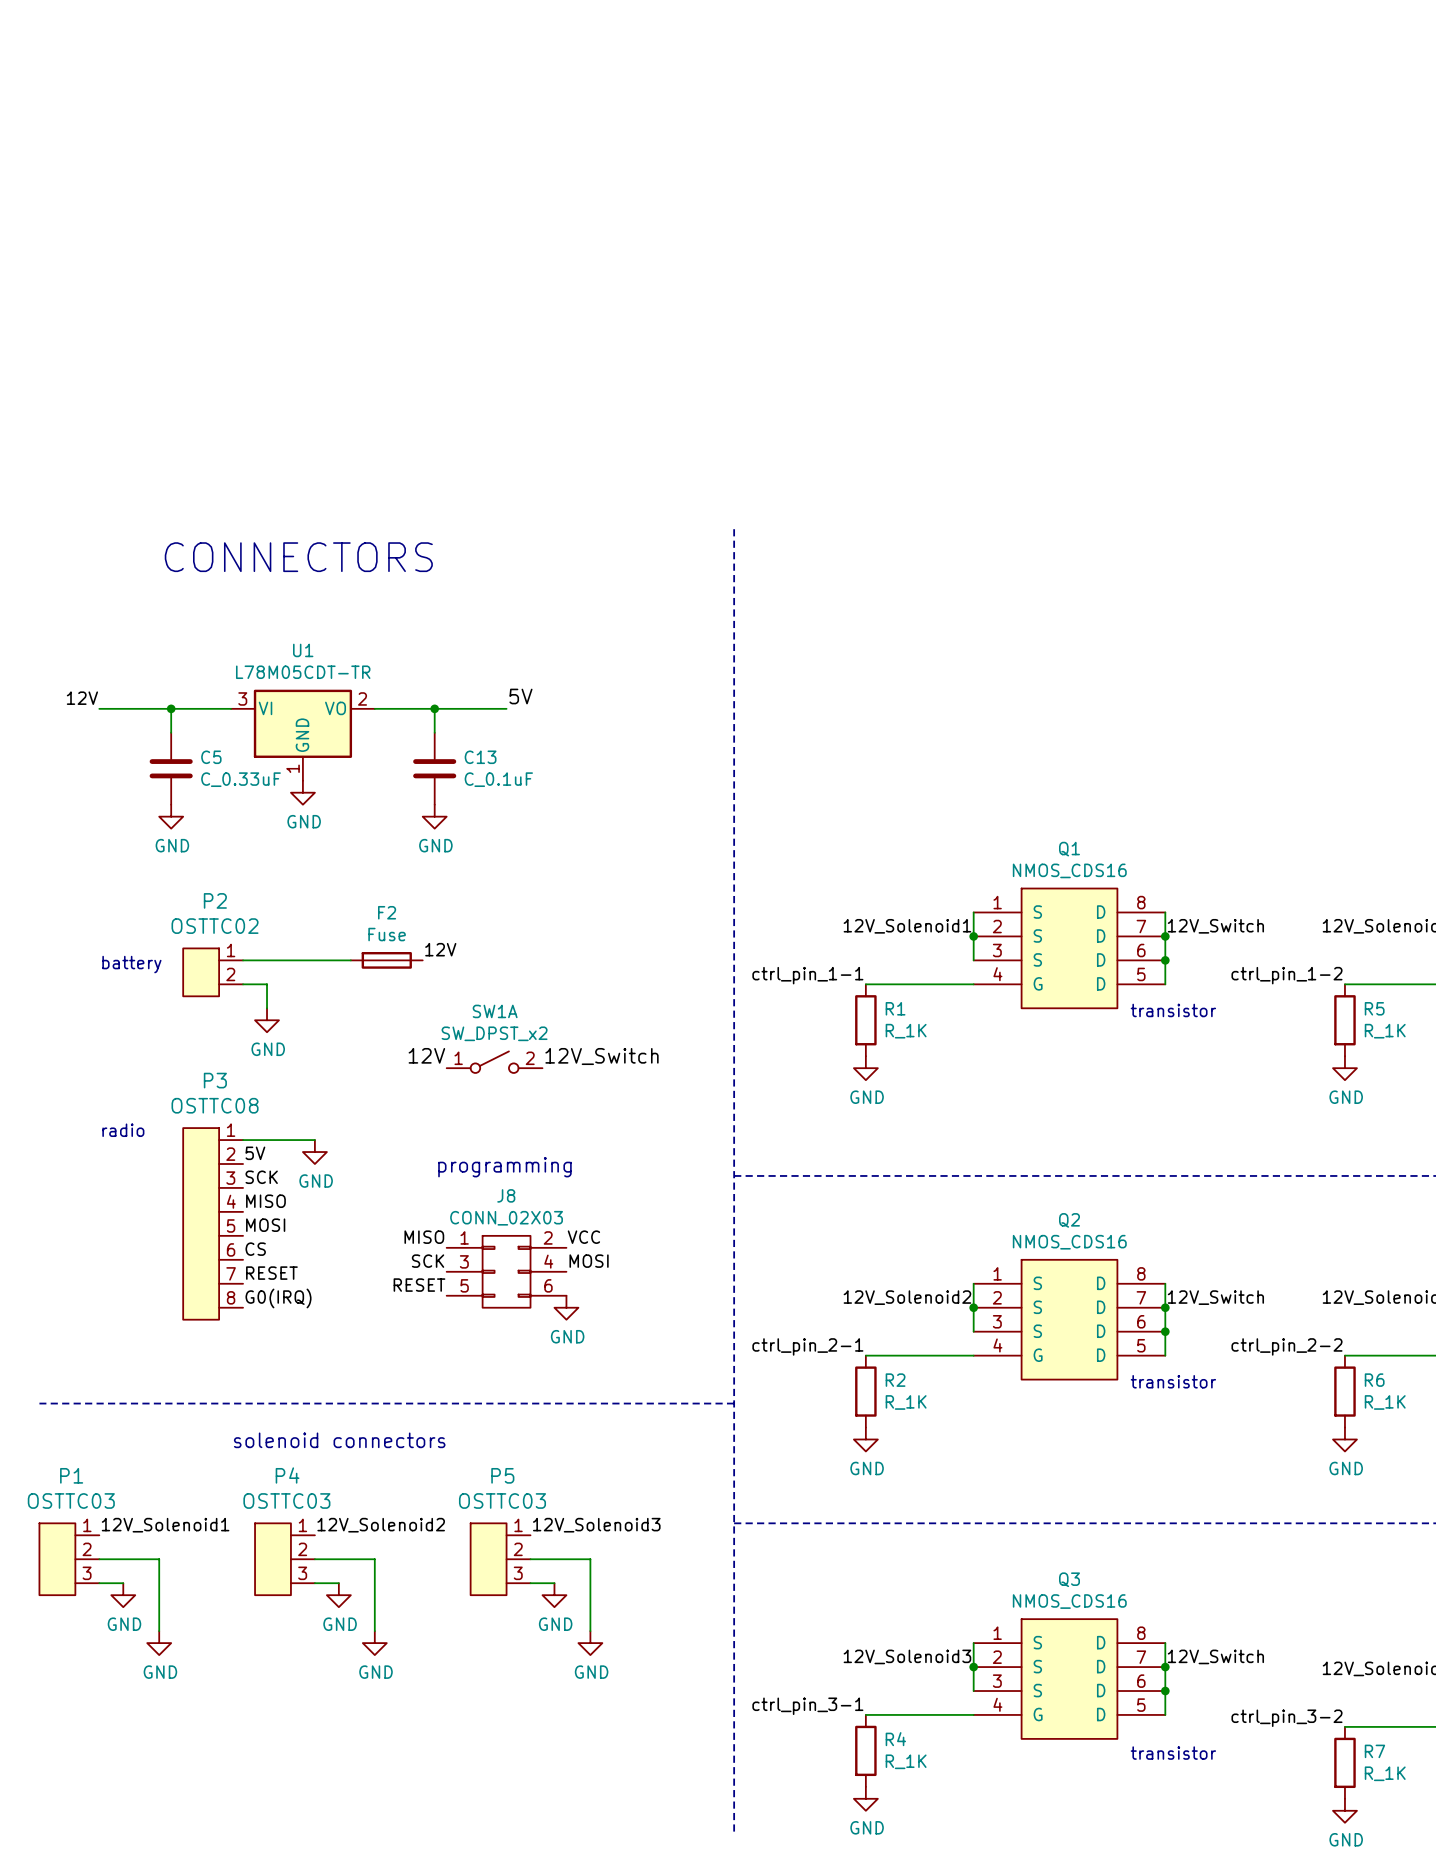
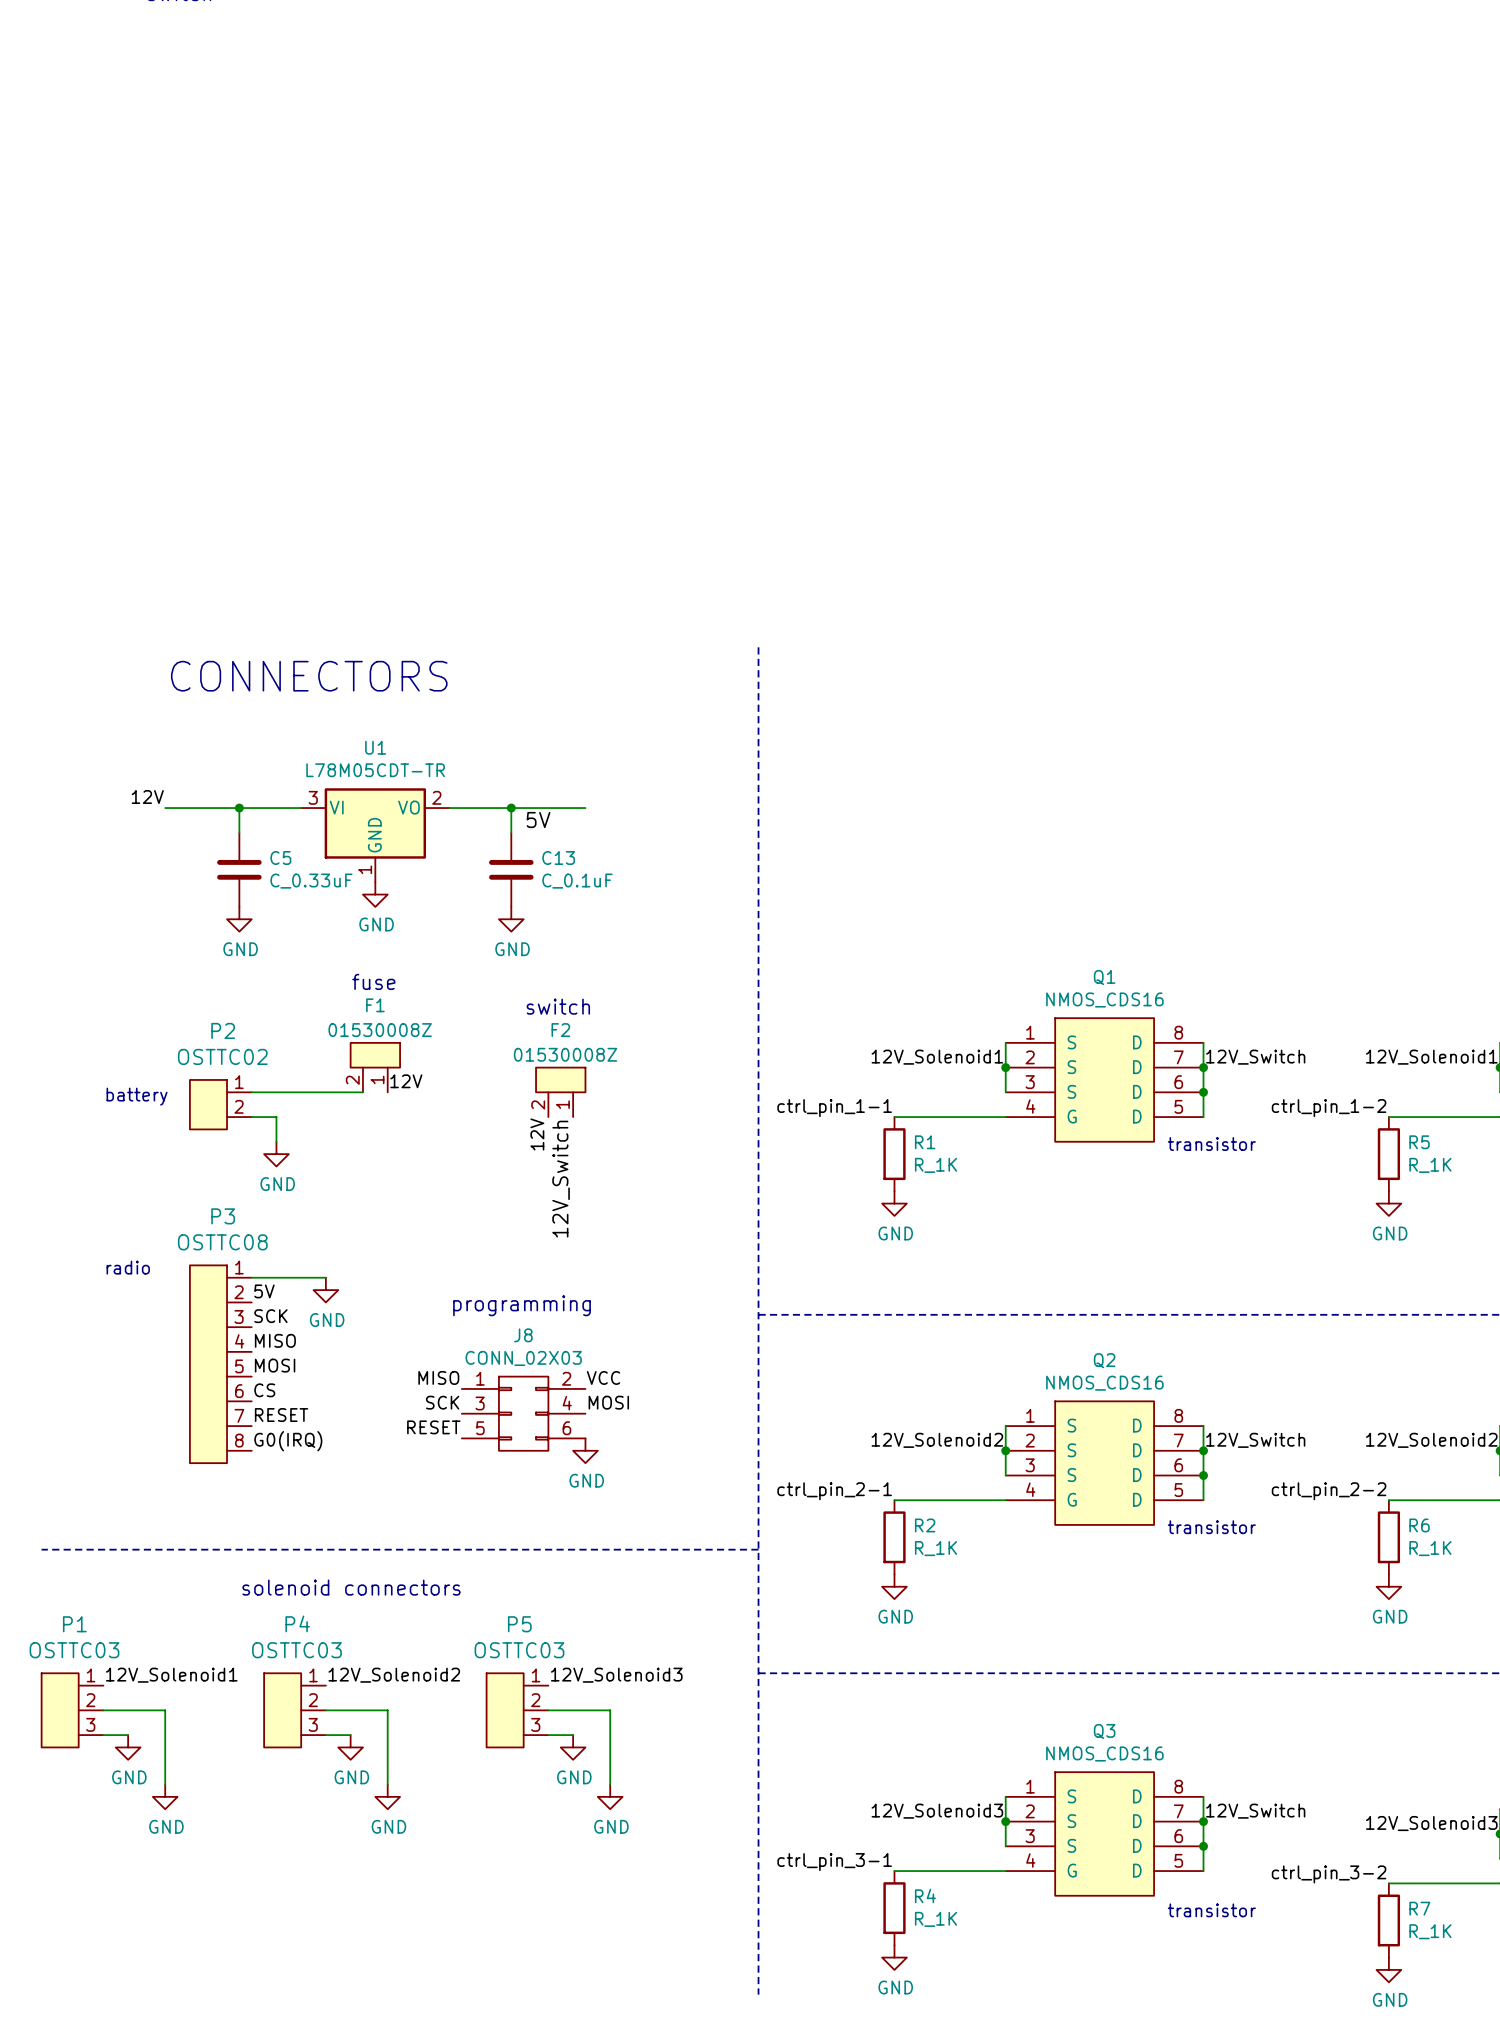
wire: none -> (165, 808) (301, 808)
junction: none -> (239, 808)
junction: none -> (511, 808)
label position: 12V (82, 698) -> 12V (147, 797)
wire: (99, 708) (231, 708) -> (239, 808) (239, 832)
wire: (171, 708) (171, 732) -> none
junction: (171, 708) -> none
wire: (374, 708) (506, 708) -> (449, 808) (585, 808)
wire: (434, 708) (434, 732) -> (511, 808) (511, 832)
junction: (434, 708) -> none
U1 position: (302, 735) -> (375, 835)
C5 position: (171, 768) -> (239, 869)
power symbol: none -> GND (375, 894)
C13 position: (434, 768) -> (511, 869)
power symbol: none -> GND (239, 919)
power symbol: GND (302, 792) -> none
power symbol: none -> GND (511, 919)
power symbol: GND (171, 816) -> none
power symbol: GND (434, 816) -> none
text: none -> fuse (373, 981)
text: none -> switch (558, 1006)
F2 value: Fuse (387, 934) -> 01530008Z (565, 1054)
F1: none -> 01530008Z (375, 1067)
label position: 12V (440, 949) -> 12V (406, 1081)
F2 symbol: [350, 952, 423, 969] -> [536, 1067, 586, 1118]
label: none -> 12V (537, 1134)
label: 12V (426, 1055) -> none
label rotation: 0° (601, 1056) -> 90° counterclockwise (561, 1179)
SW1A: SW_DPST_x2 (494, 1062) -> none

